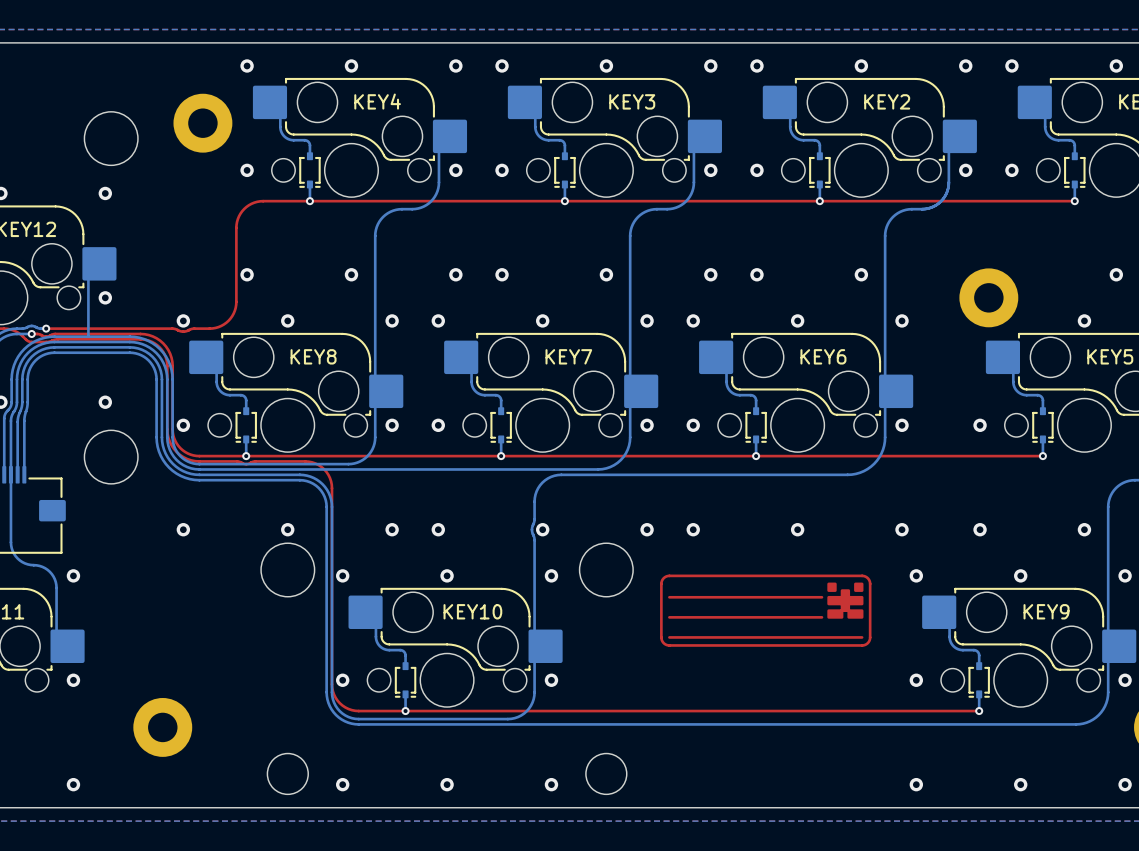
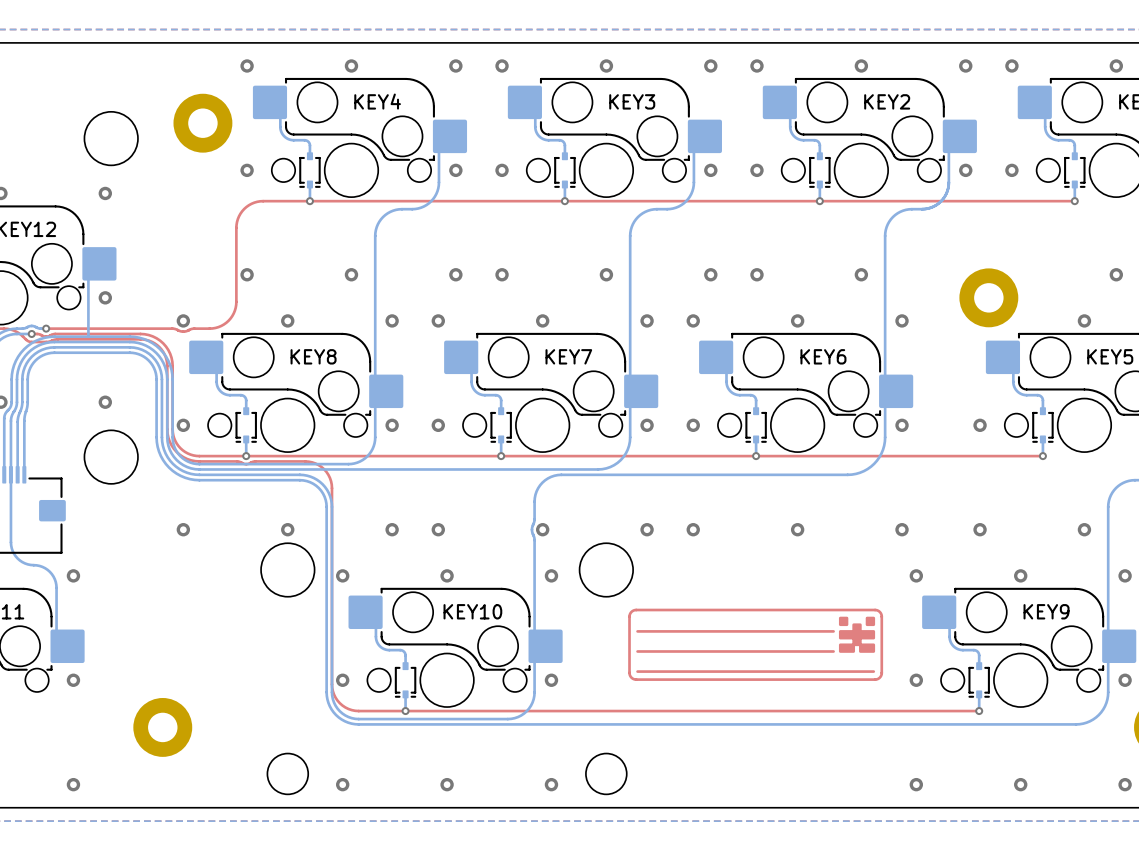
top track: (862, 575) (667, 576) (661, 582) (661, 640) (669, 645) (864, 645) (870, 638) (870, 583) (867, 578) (862, 575) -> none
drawing: [827, 582, 864, 619] -> none
top track: (821, 597) (669, 597) -> none
drawing position: (845, 600) -> (857, 634)
top track: none -> (875, 610) (634, 610) (629, 615) (629, 674) (636, 679) (876, 679) (881, 673) (881, 616) (879, 611) (875, 610)
drawing: none -> [838, 616, 876, 653]
top track: (821, 617) (669, 617) -> none
top track: none -> (833, 631) (637, 631)
top track: (862, 637) (669, 637) -> none
top track: none -> (833, 651) (637, 651)
top track: none -> (873, 671) (637, 671)

